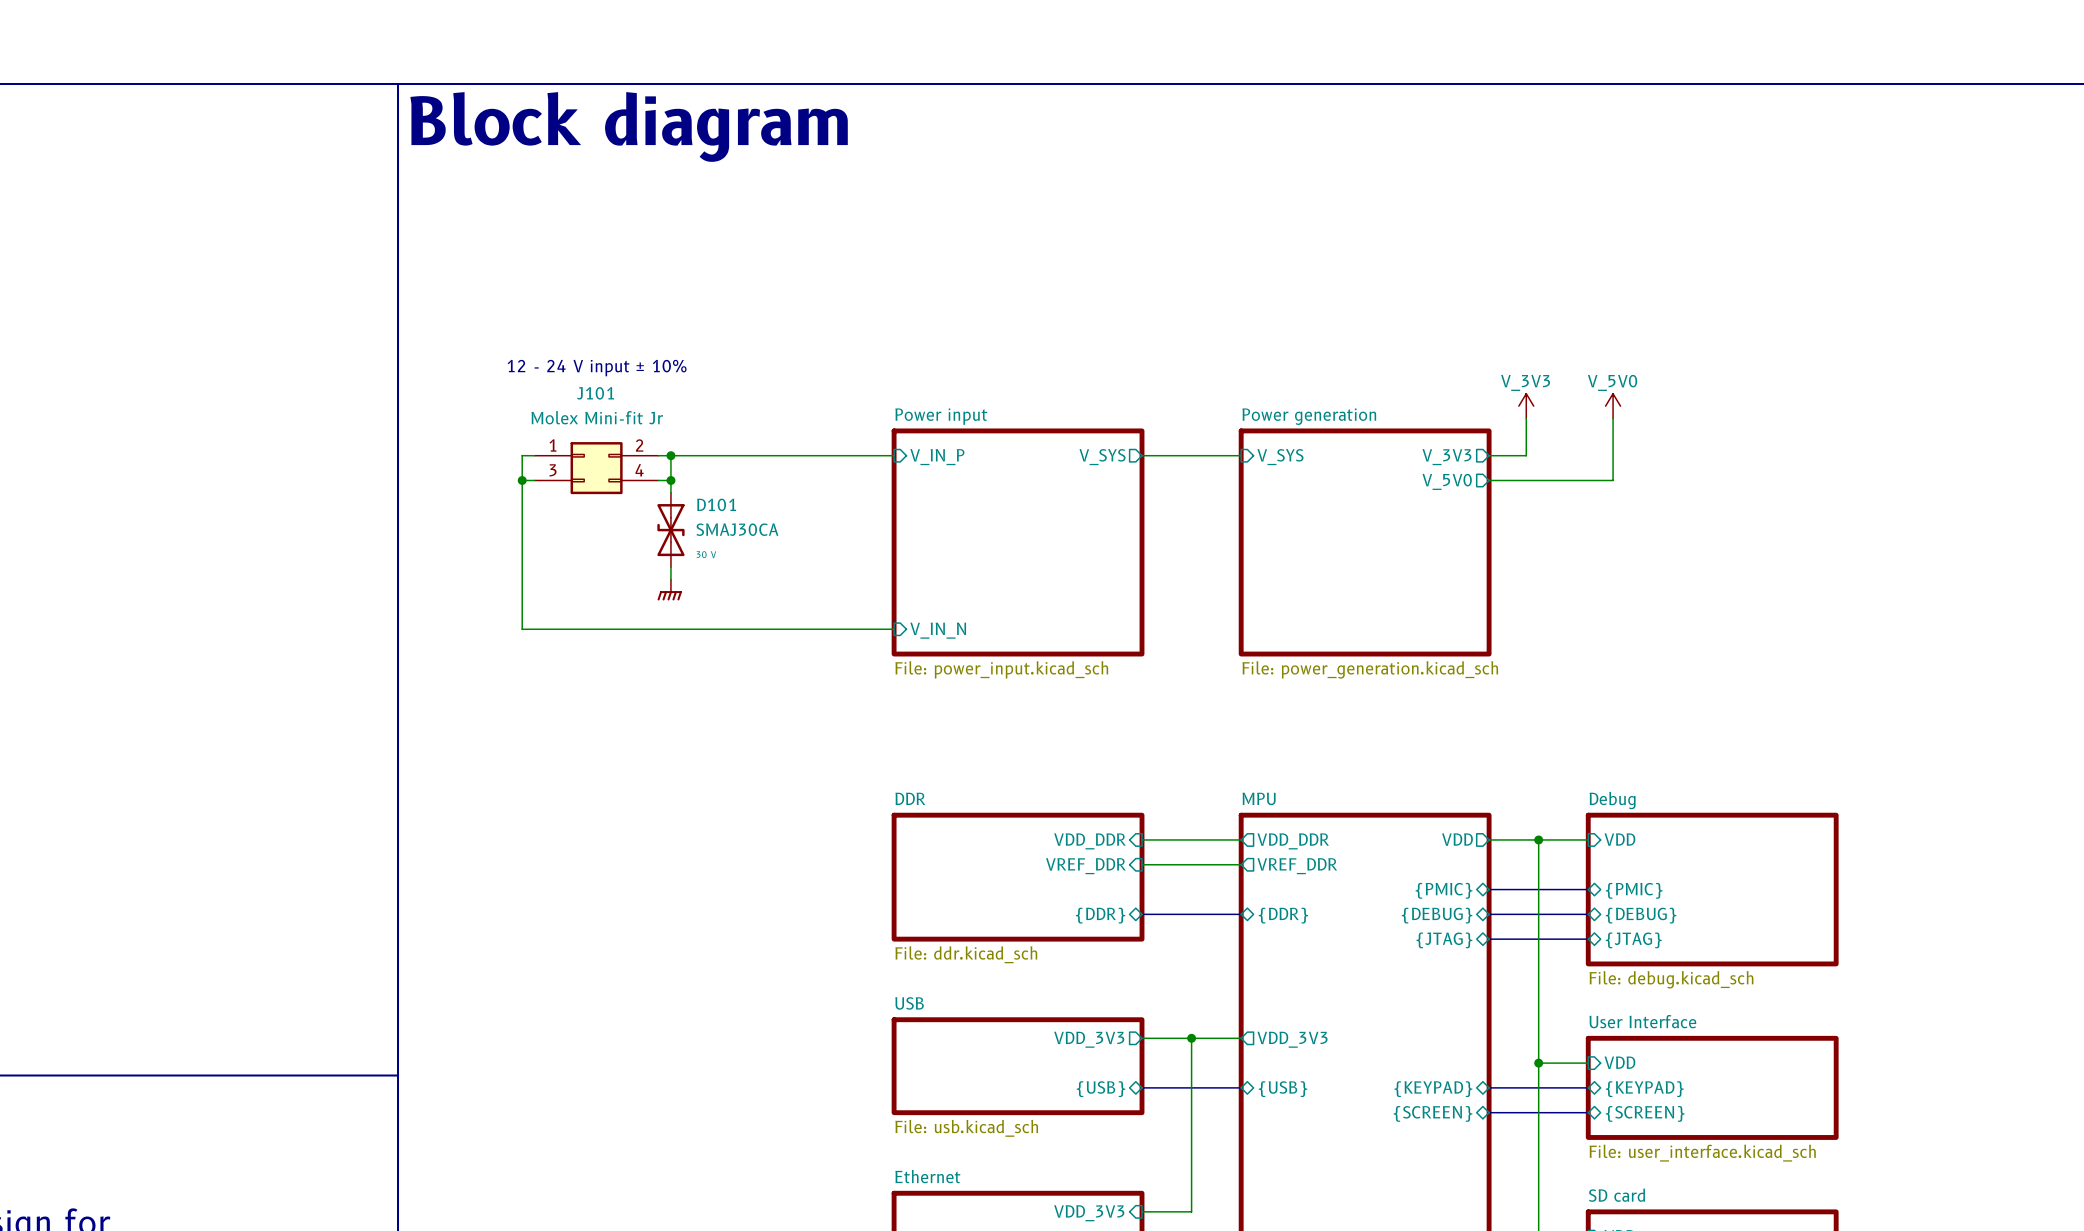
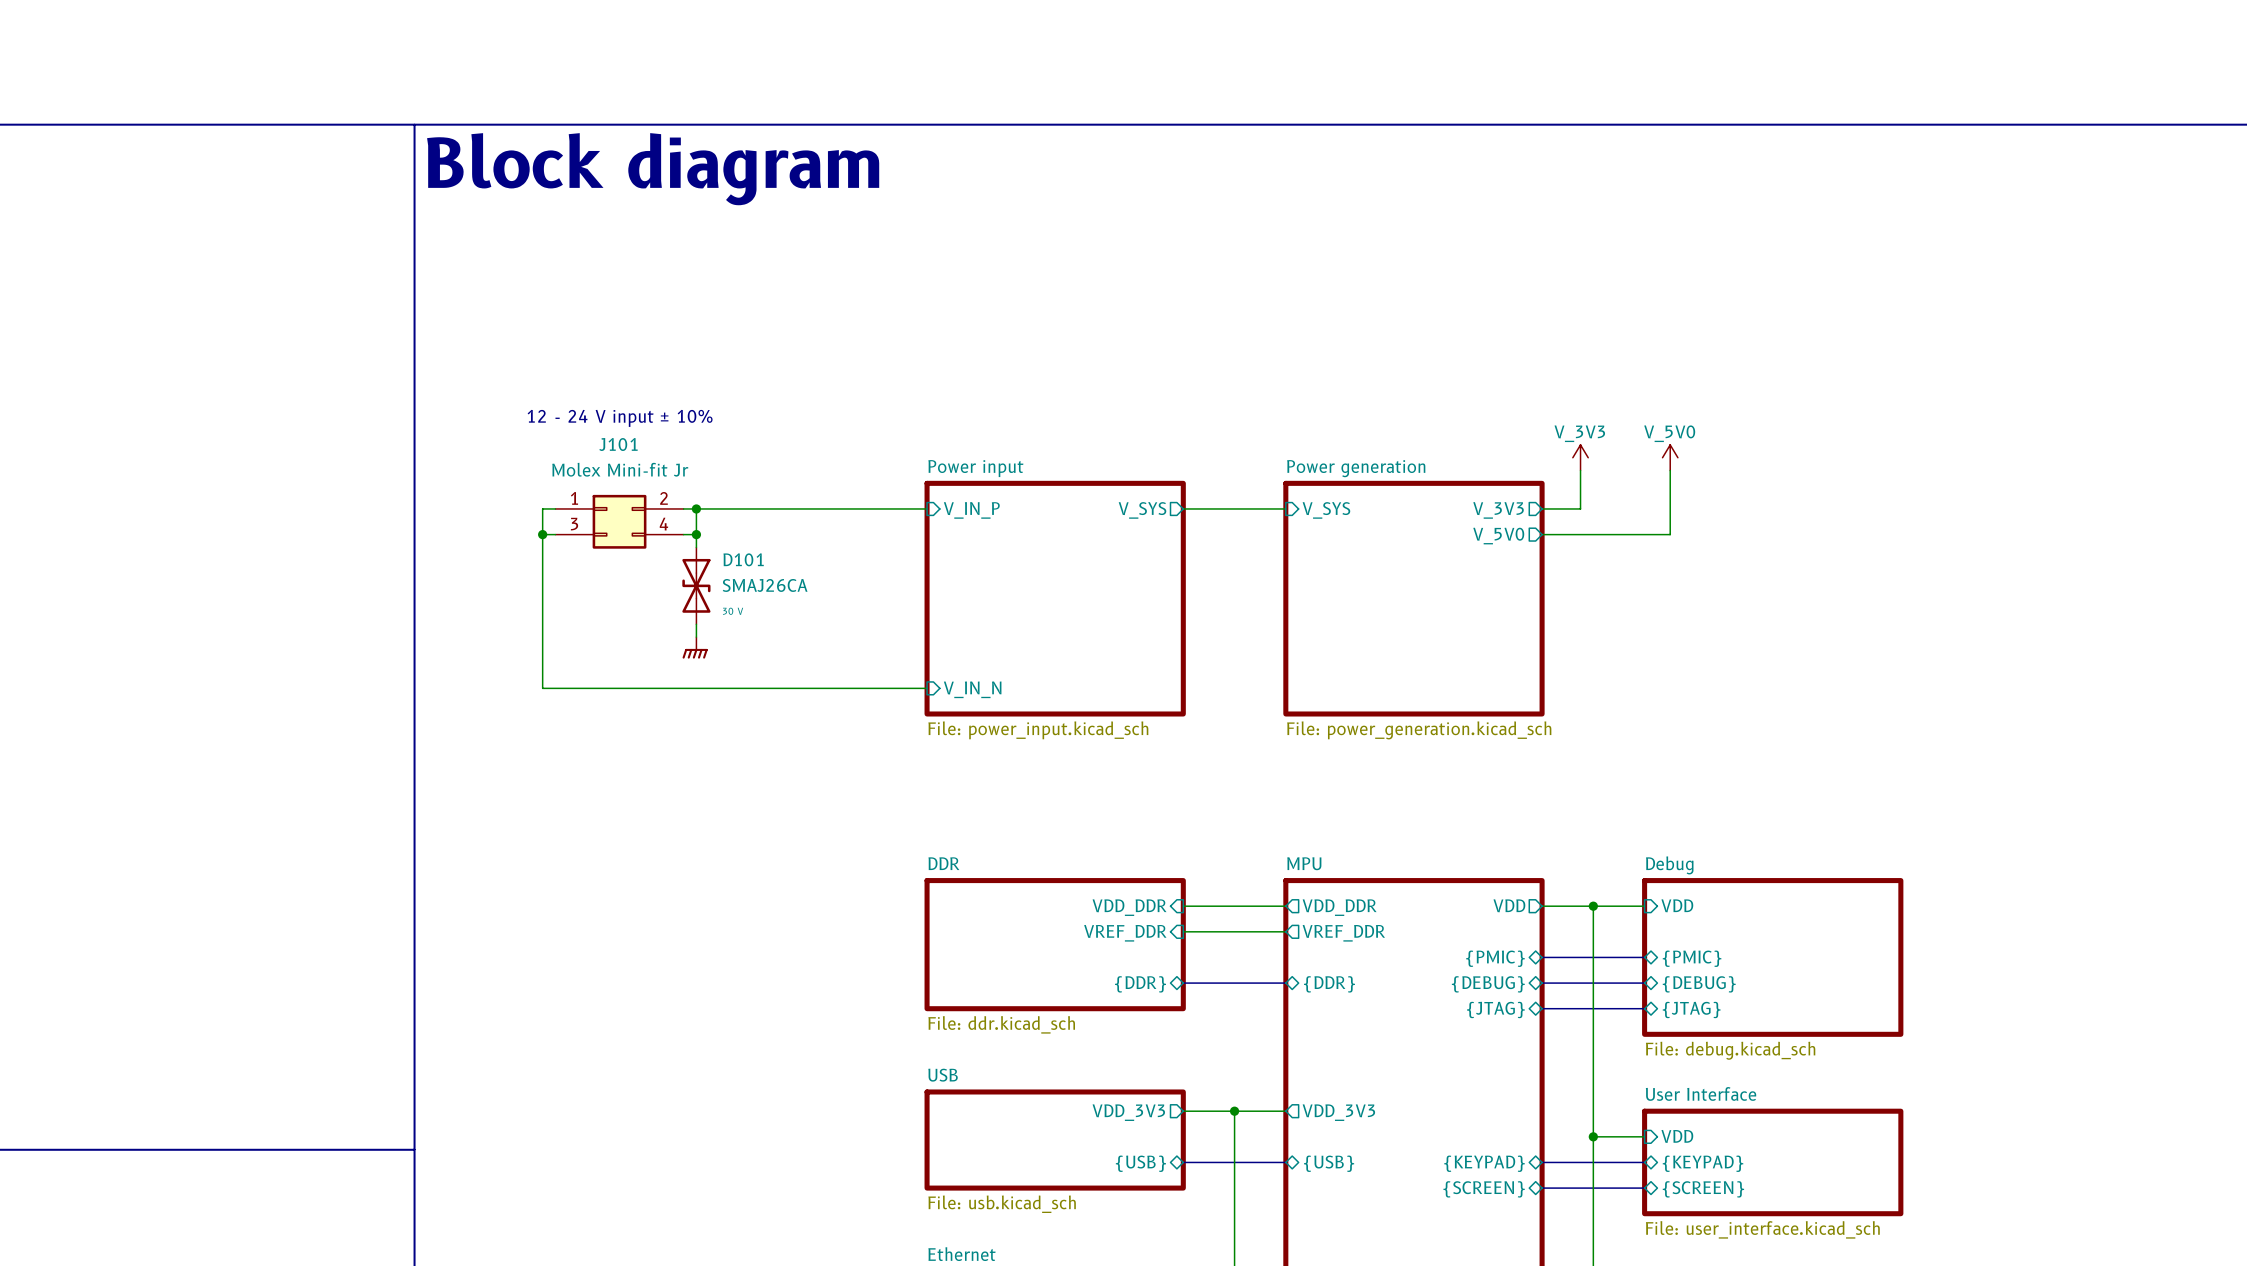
D101 value: SMAJ30CA (737, 529) -> SMAJ26CA (765, 585)

